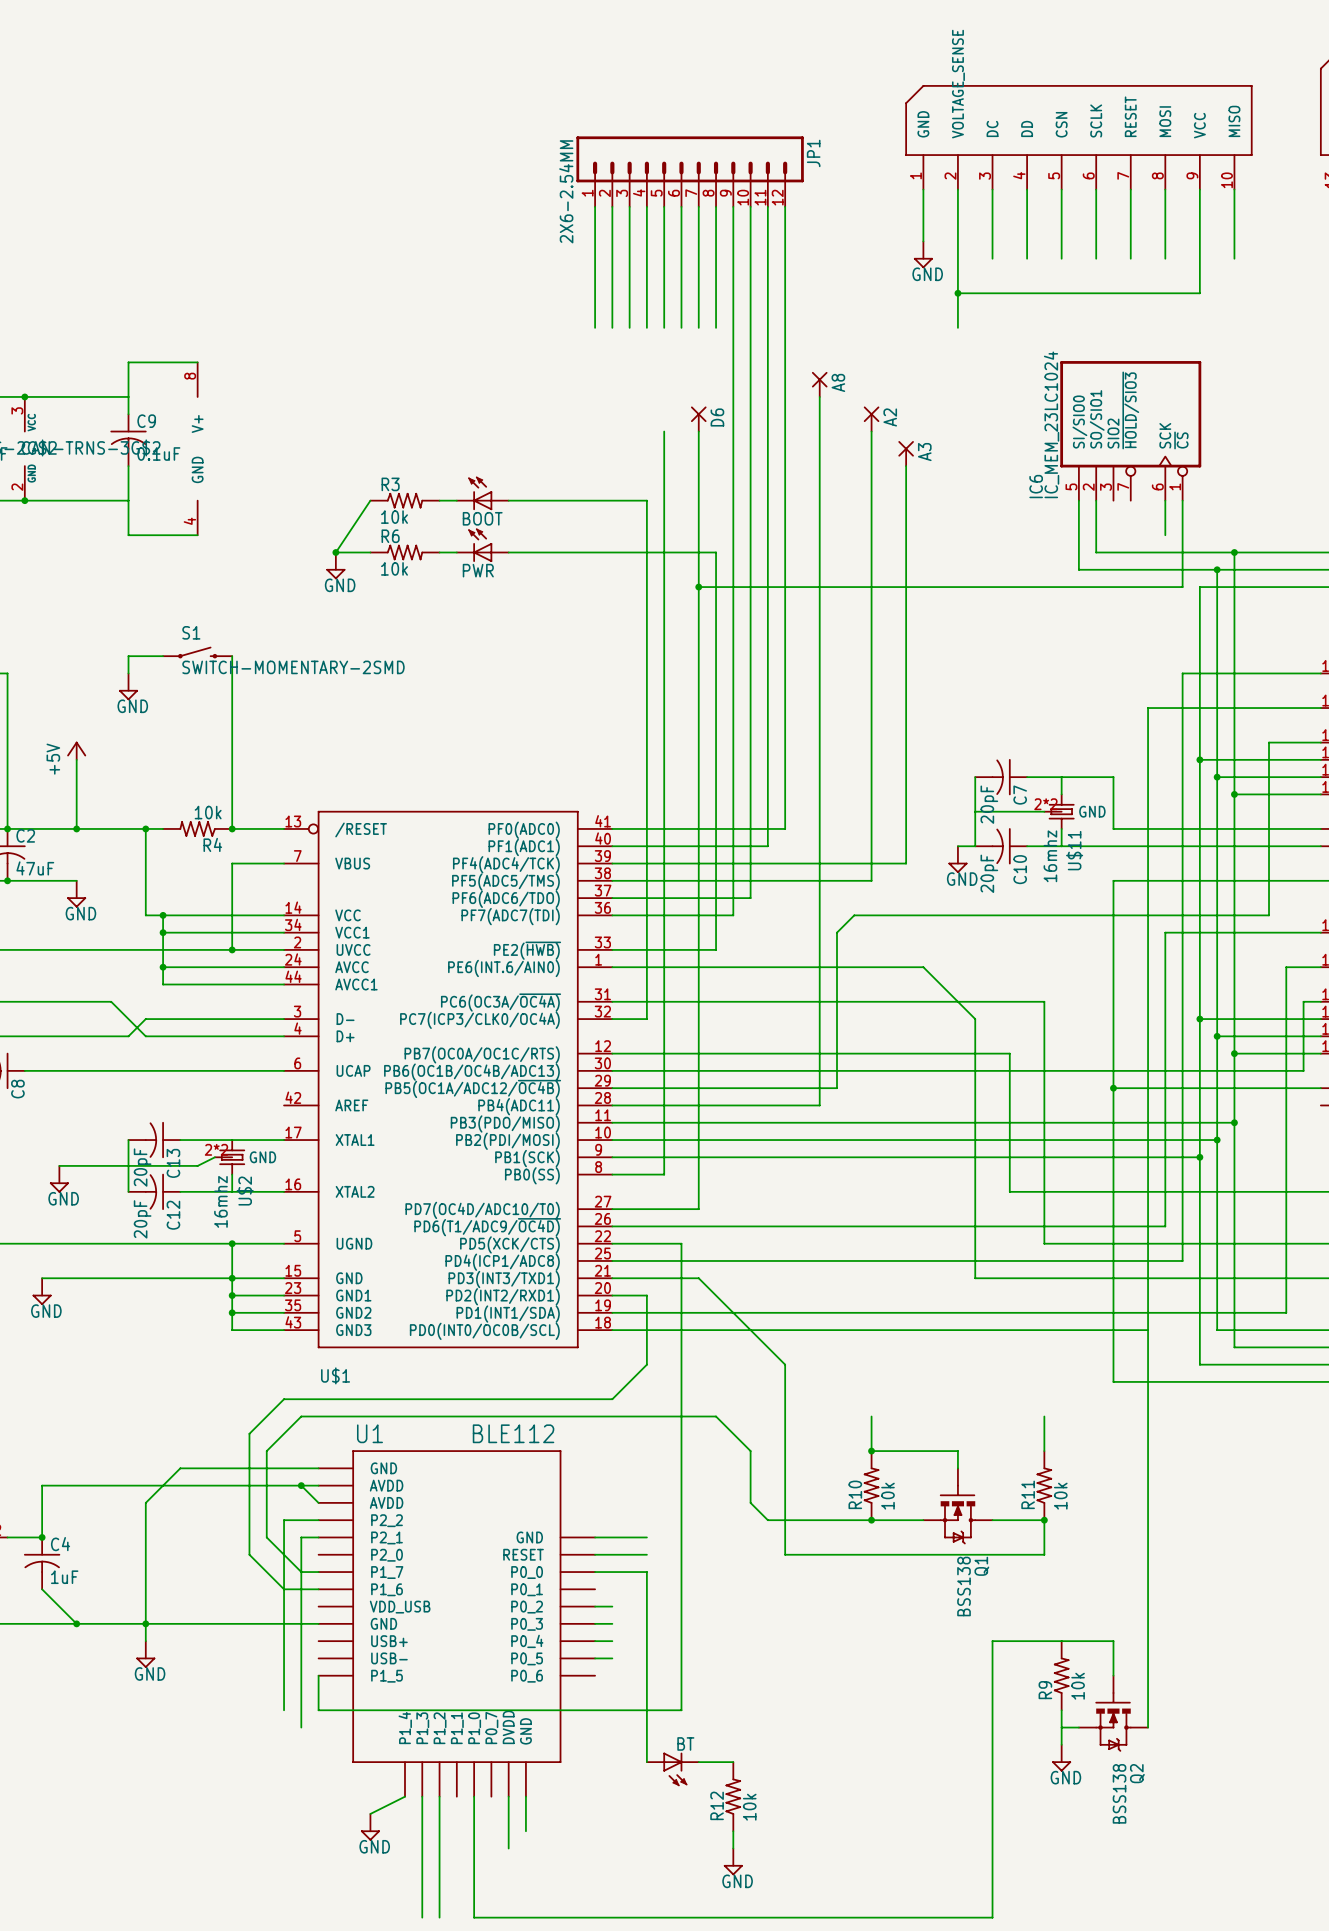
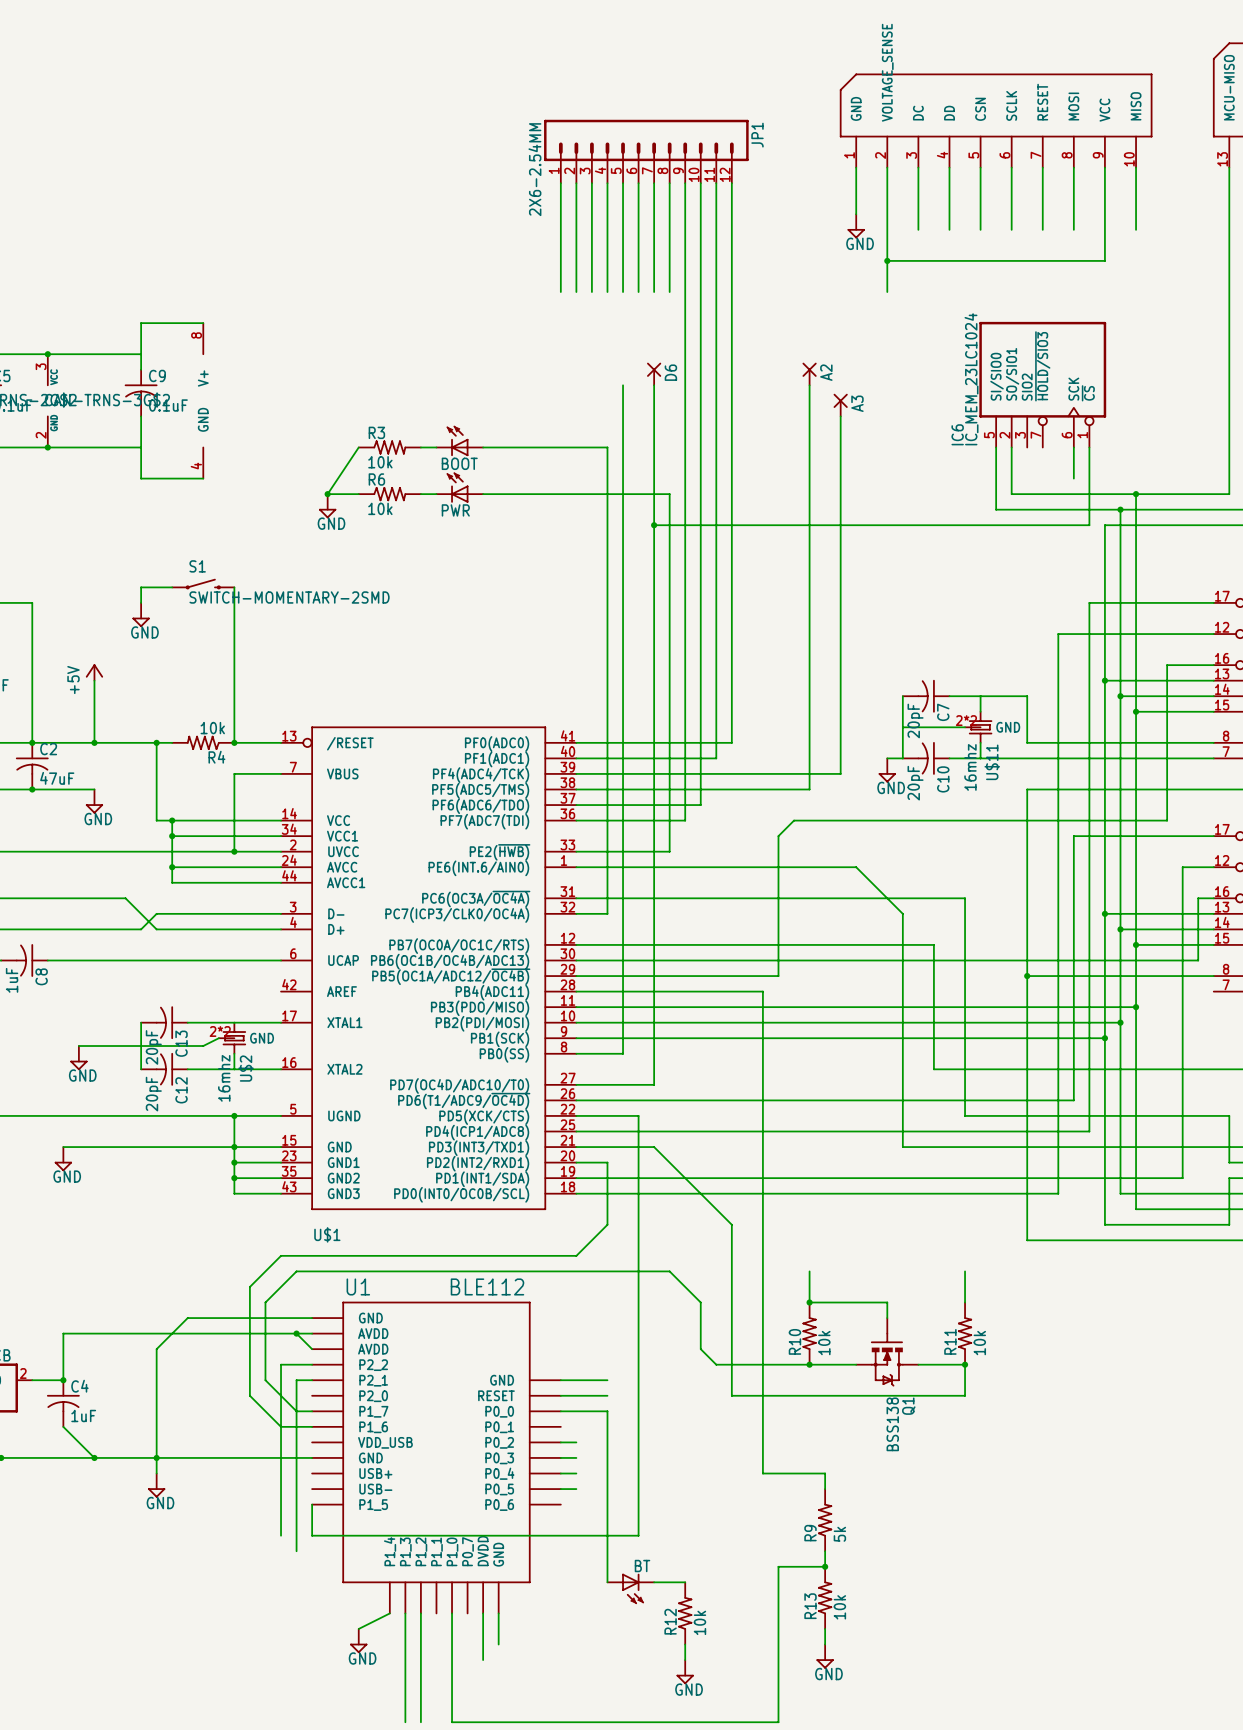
A8: (819, 384) -> none
wire: (819, 396) (819, 1105) -> (825, 1489) (825, 1473) (762, 1473) (762, 991)
wire: (1148, 1330) (1148, 1727) -> none
R9 position: (1061, 1675) -> (825, 1520)
wire: (1113, 1675) (1113, 1641) (992, 1641) (992, 1917) (837, 1917) -> (825, 1551) (825, 1566) (778, 1566) (778, 1722)
R9 value: 10k (1078, 1686) -> 5k (839, 1534)
wire: (1061, 1710) (1061, 1744) -> none
Q2: BSS138 (1113, 1713) -> none
wire: (1061, 1727) (1078, 1727) -> none
junction: none -> (825, 1566)
power symbol: GND (1061, 1758) -> none
R13: none -> 10k (825, 1597)
wire: none -> (825, 1628) (825, 1644)
power symbol: none -> GND (825, 1656)

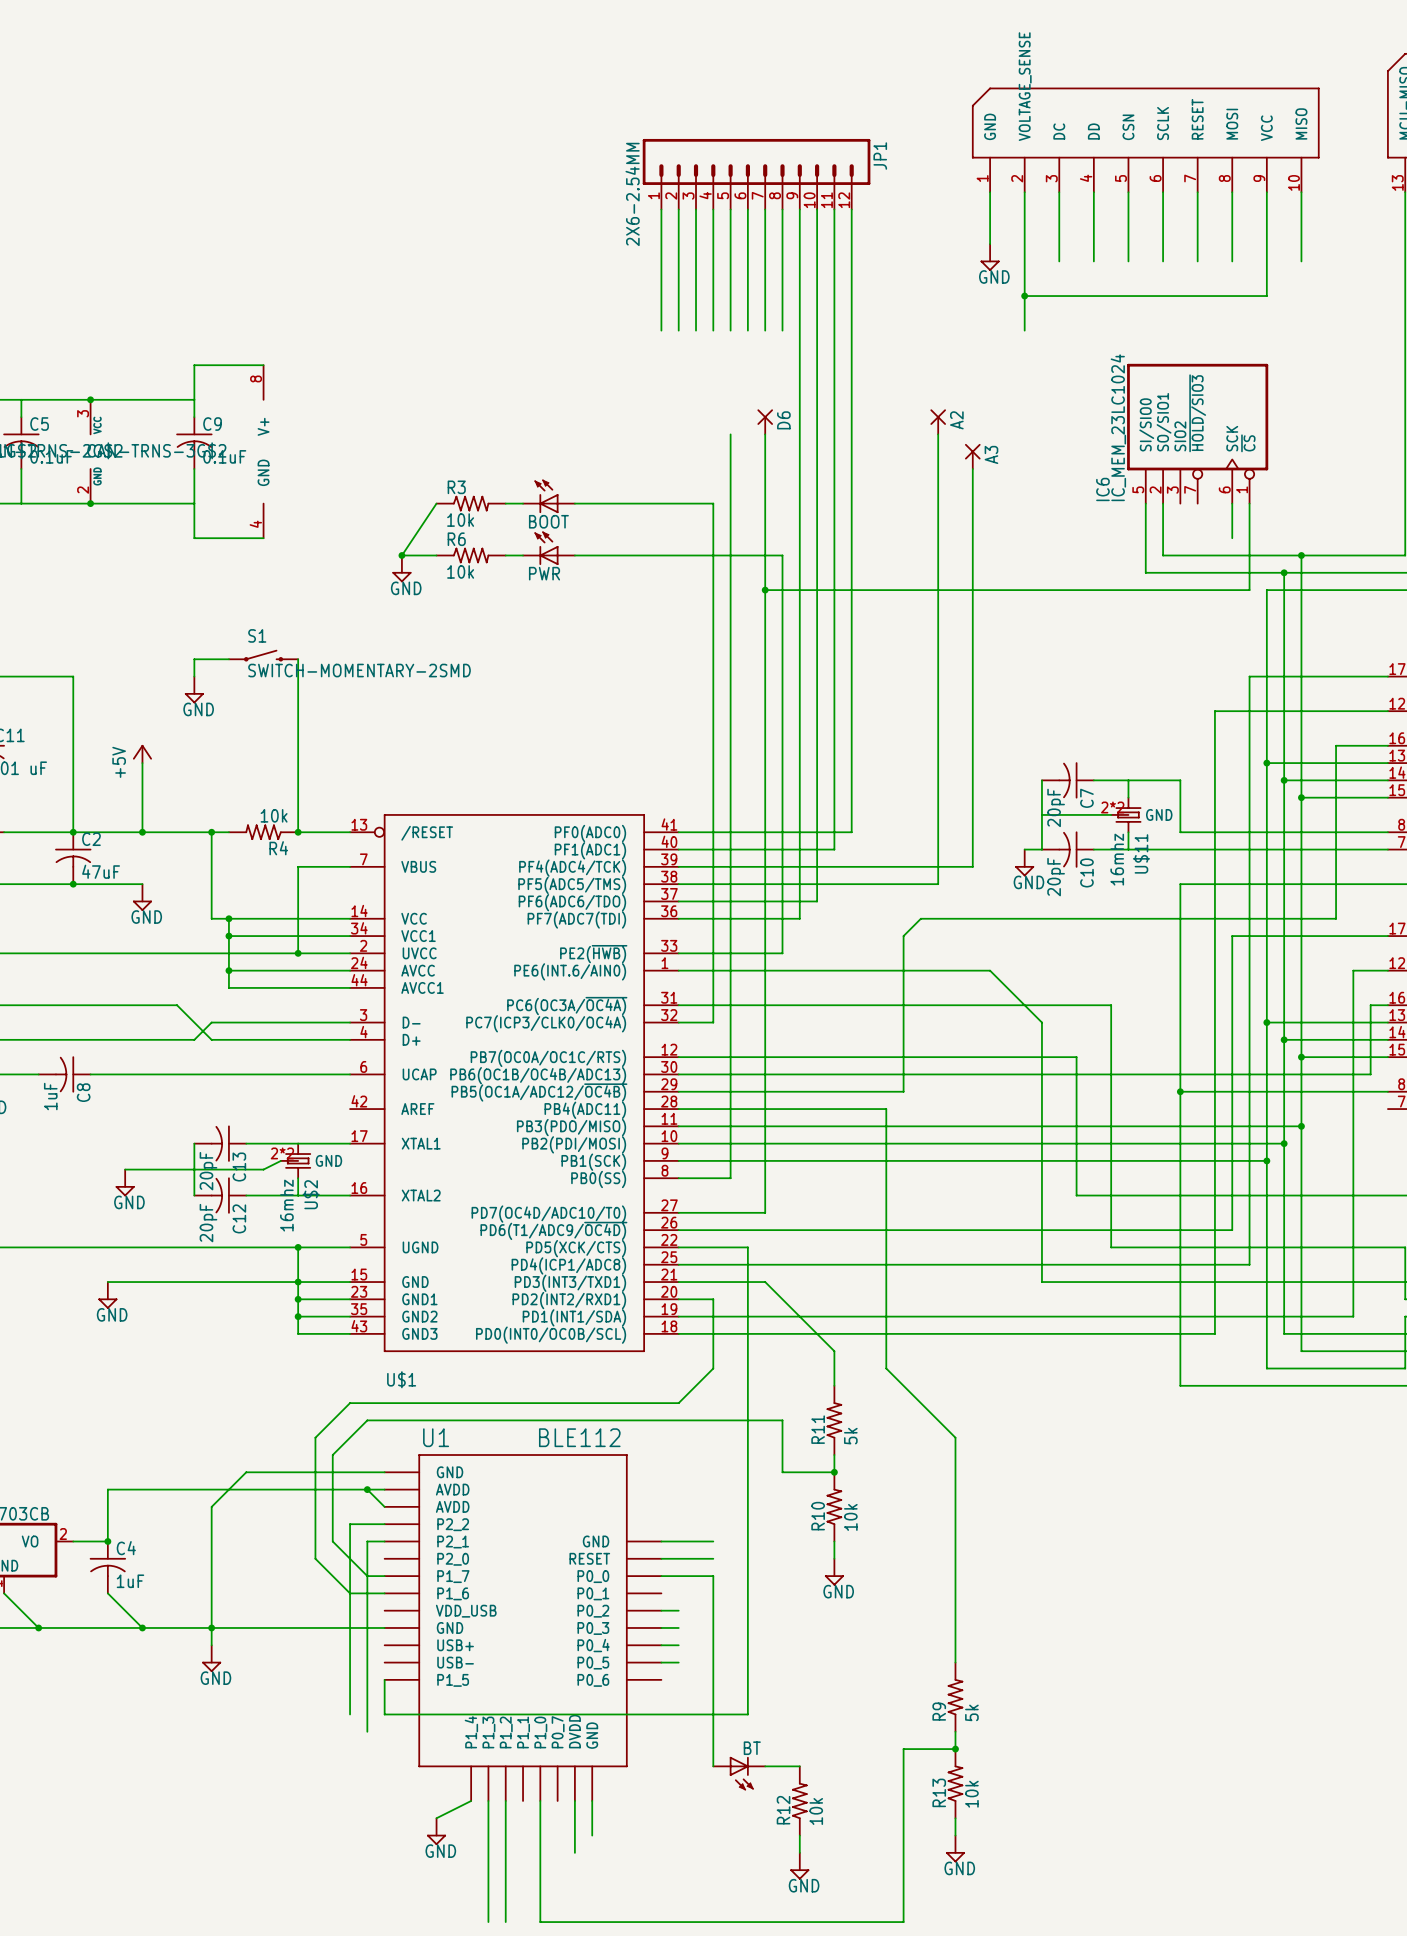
wire: (716, 1209) (731, 1224) (731, 1395) (965, 1395) (965, 1364) (918, 1364) -> (834, 1351) (834, 1385)
wire: (762, 1224) (762, 1473) (825, 1473) -> (886, 1368) (955, 1437) (955, 1645)
wire: (669, 1271) (700, 1302) (700, 1349) (716, 1364) (856, 1364) -> (782, 1420) (782, 1472) (834, 1472) (834, 1455)
wire: (809, 1271) (809, 1302) (887, 1302) (887, 1318) -> none
wire: (965, 1271) (965, 1302) -> none
junction: (809, 1302) -> none
junction: none -> (834, 1472)
R10 position: (809, 1333) -> (834, 1506)
R11 position: (965, 1333) -> (834, 1420)
R11 value: 10k (979, 1343) -> 5k (850, 1436)
Q1: BSS138 (887, 1352) -> none
junction: (809, 1364) -> none
junction: (965, 1364) -> none
wire: none -> (834, 1541) (834, 1558)
power symbol: none -> GND (834, 1572)

